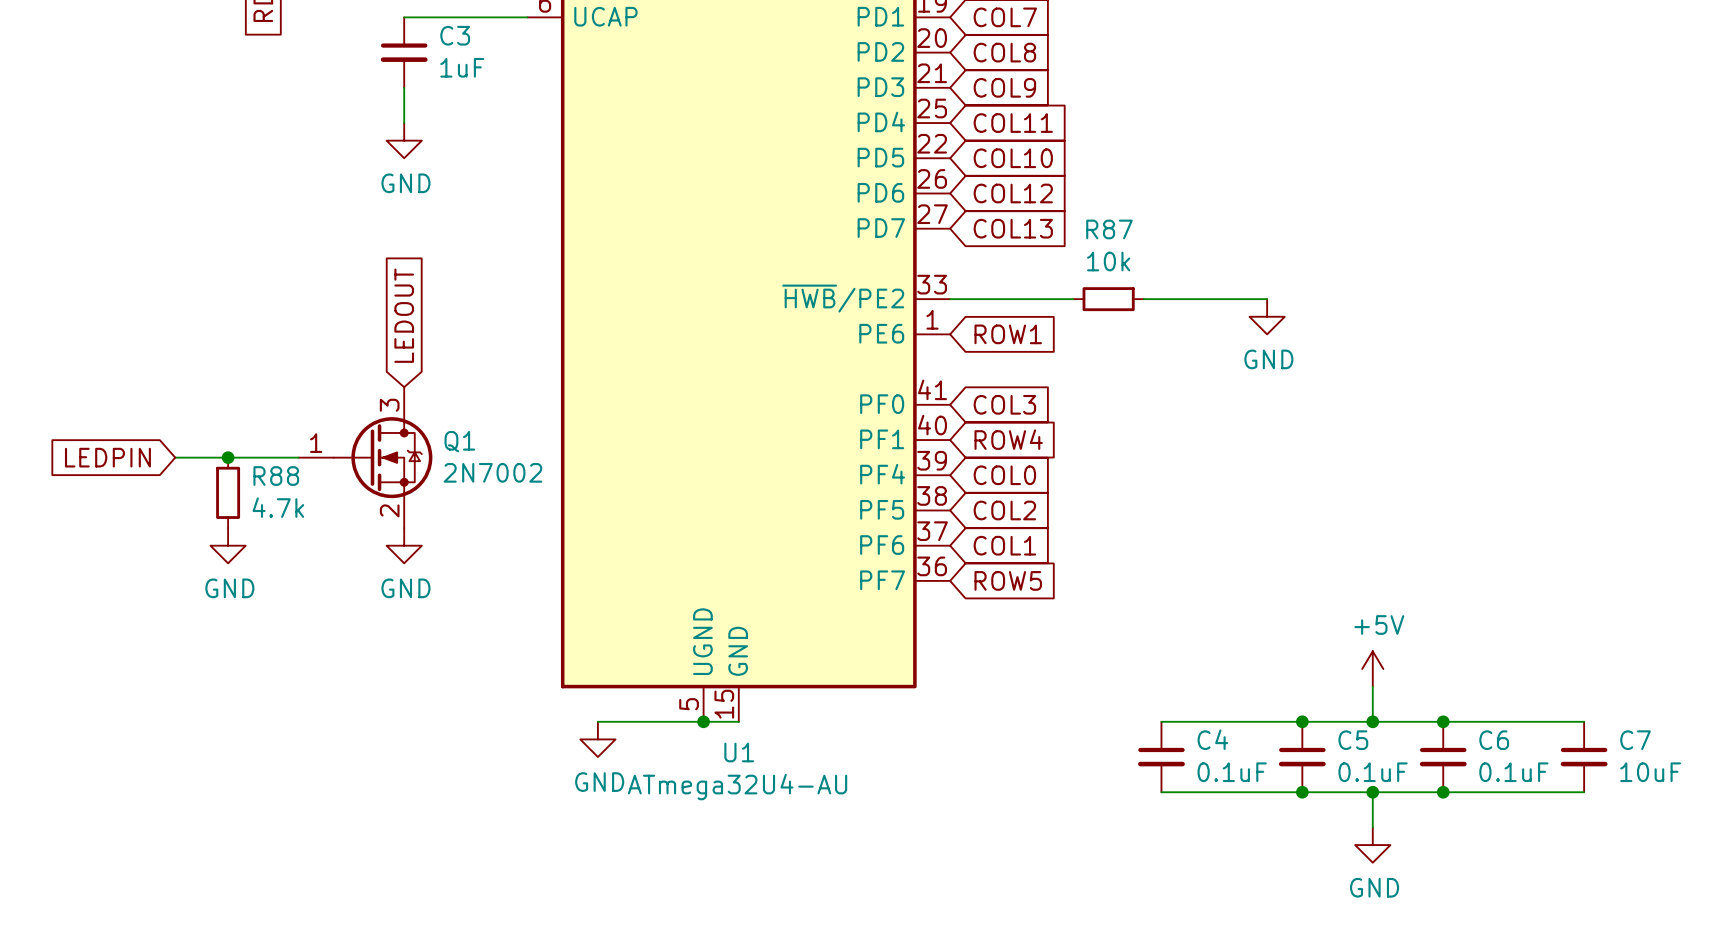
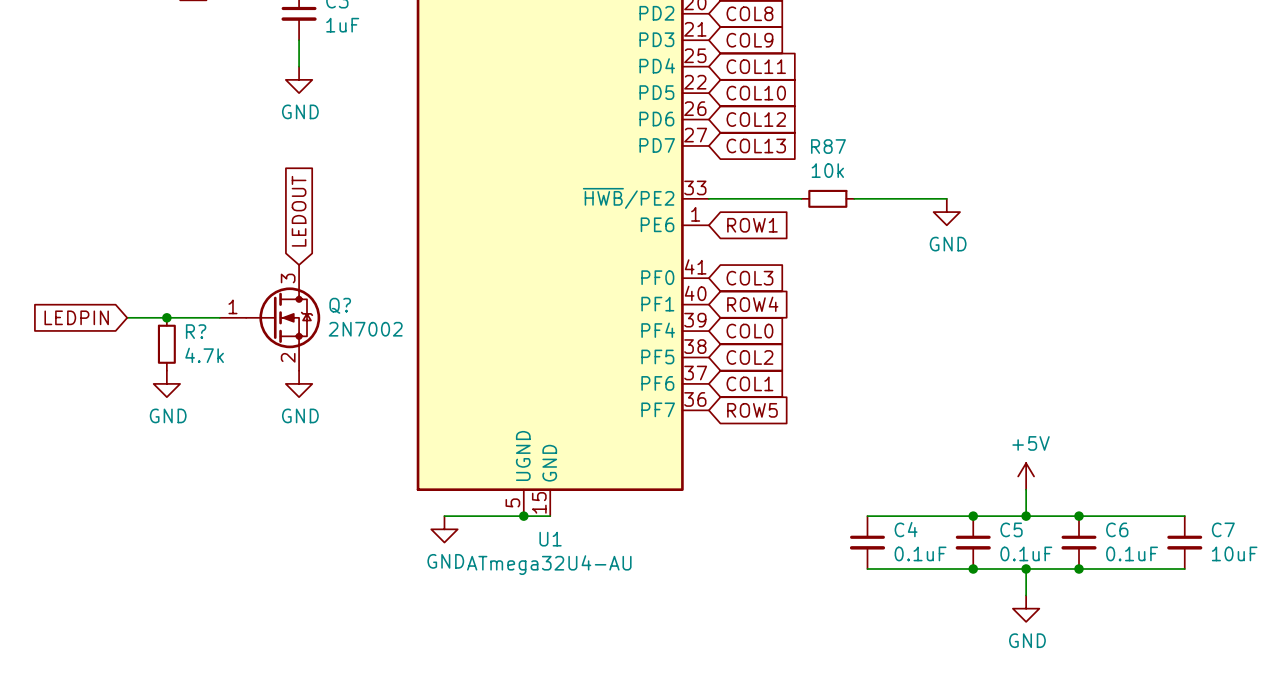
Q1 name: Q1 (459, 441) -> Q? (340, 305)
R88 name: R88 (276, 476) -> R? (196, 331)

